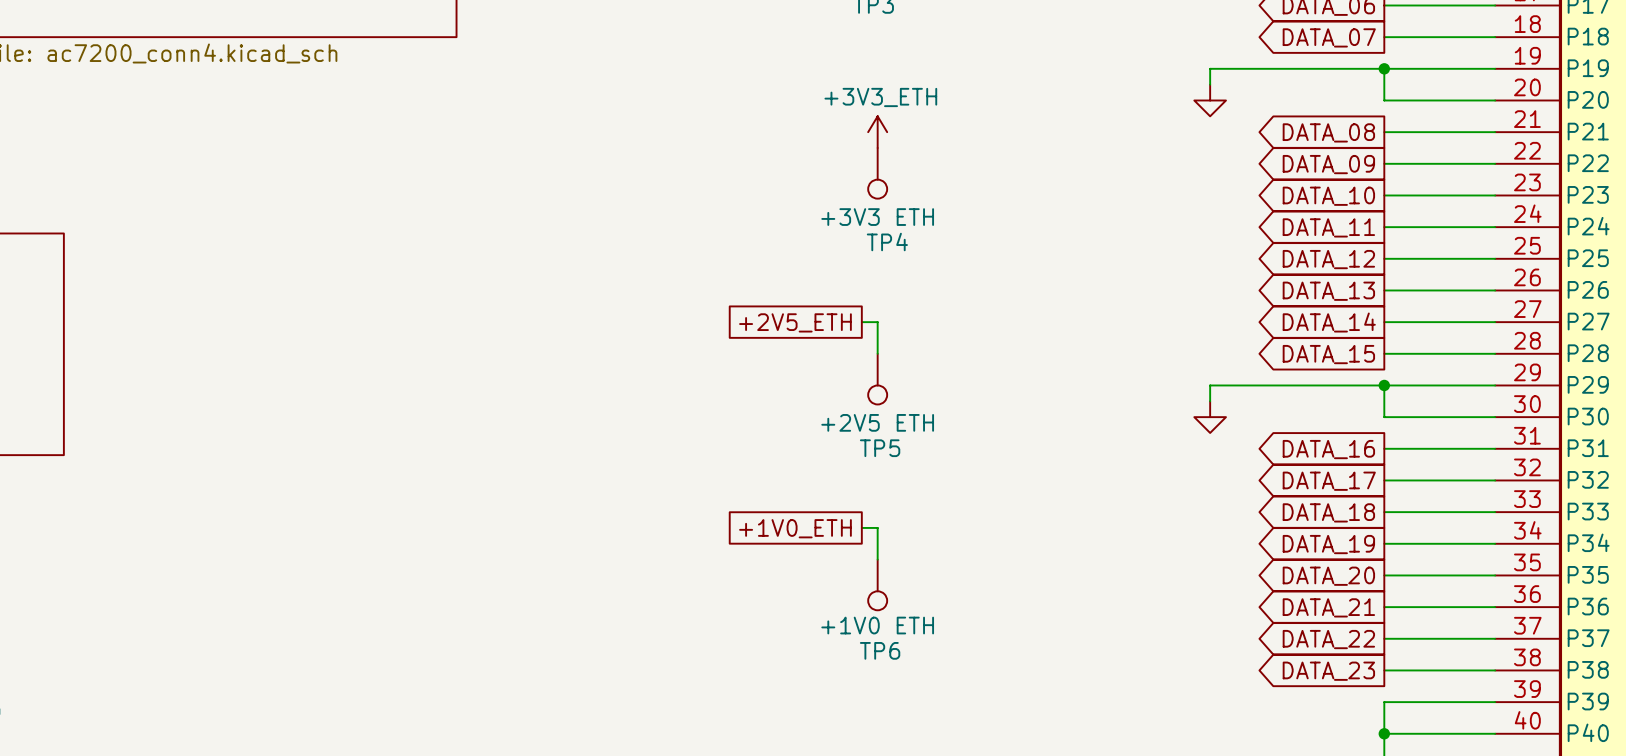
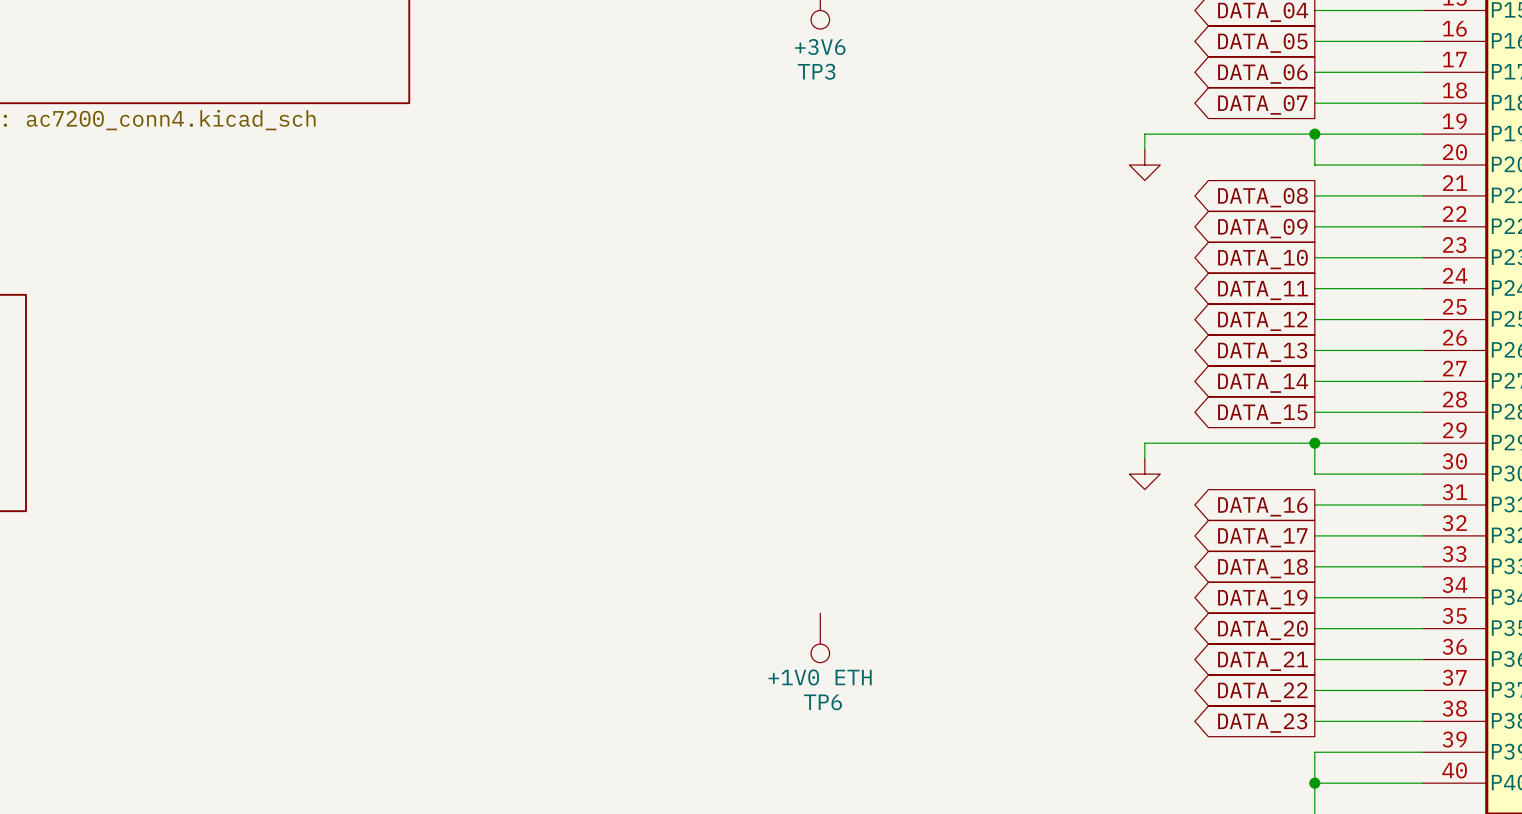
power symbol: +3V3_ETH (877, 132) -> none
TP4: +3V3 ETH (877, 173) -> none
global label: +2V5_ETH (795, 322) -> none
wire: (861, 322) (877, 322) (877, 353) -> none
TP5: +2V5 ETH (877, 379) -> none
wire: (861, 527) (877, 527) (877, 559) -> none
global label: +1V0_ETH (795, 528) -> none

